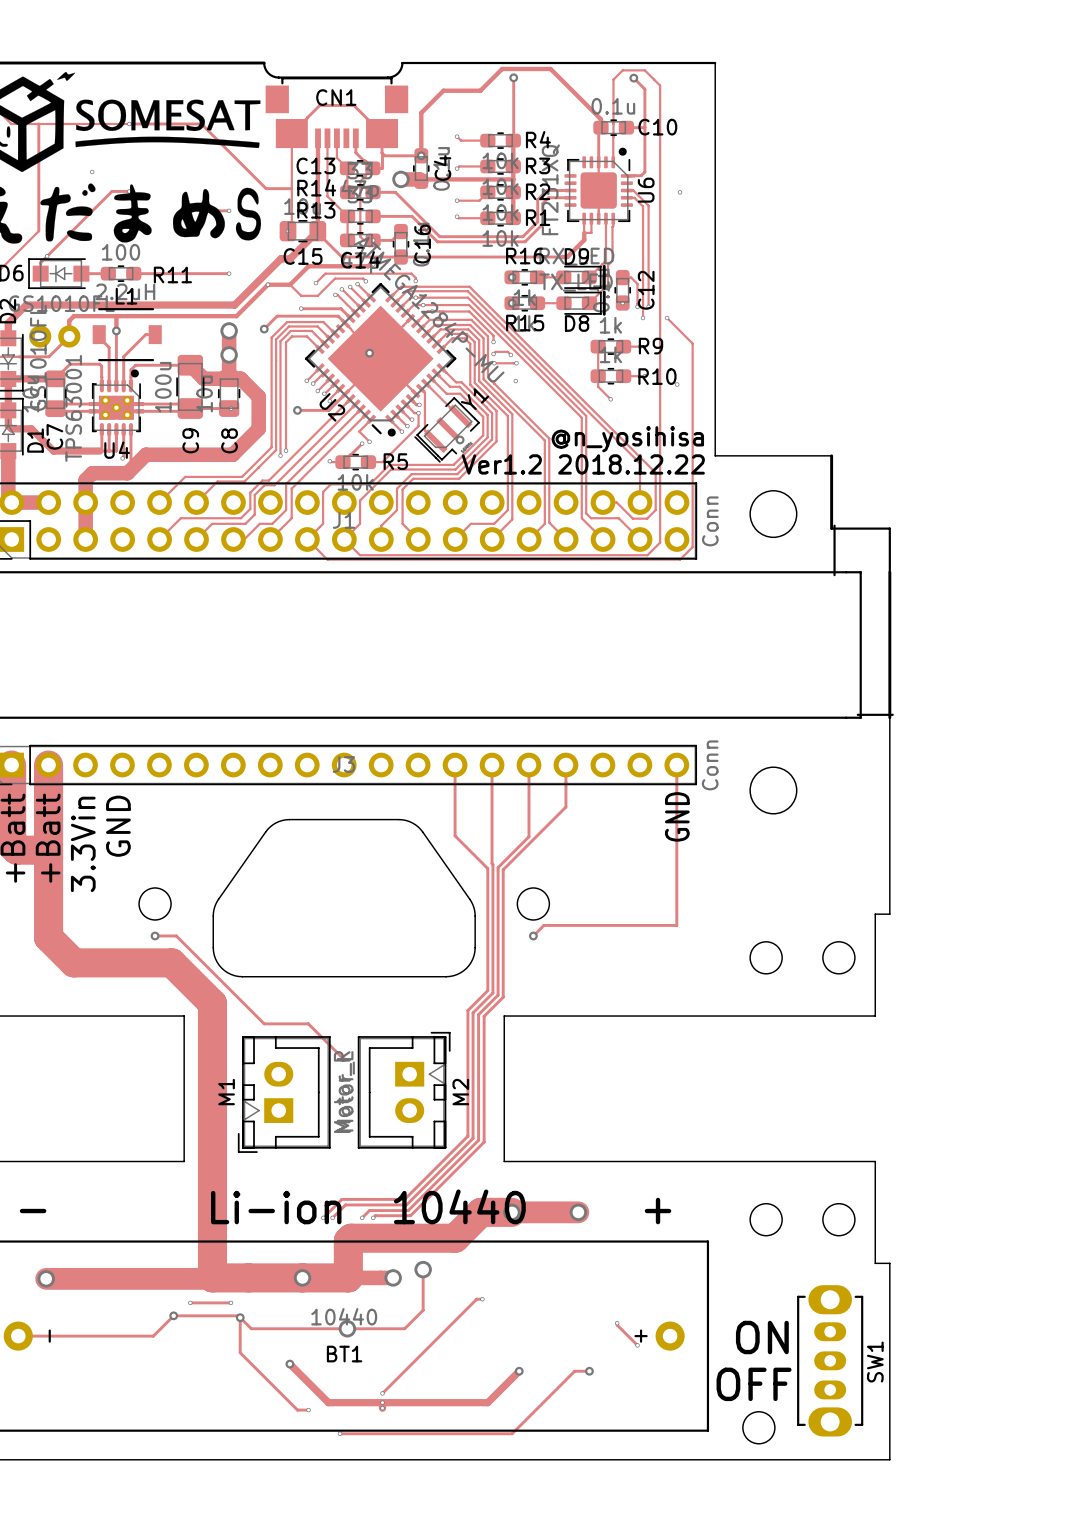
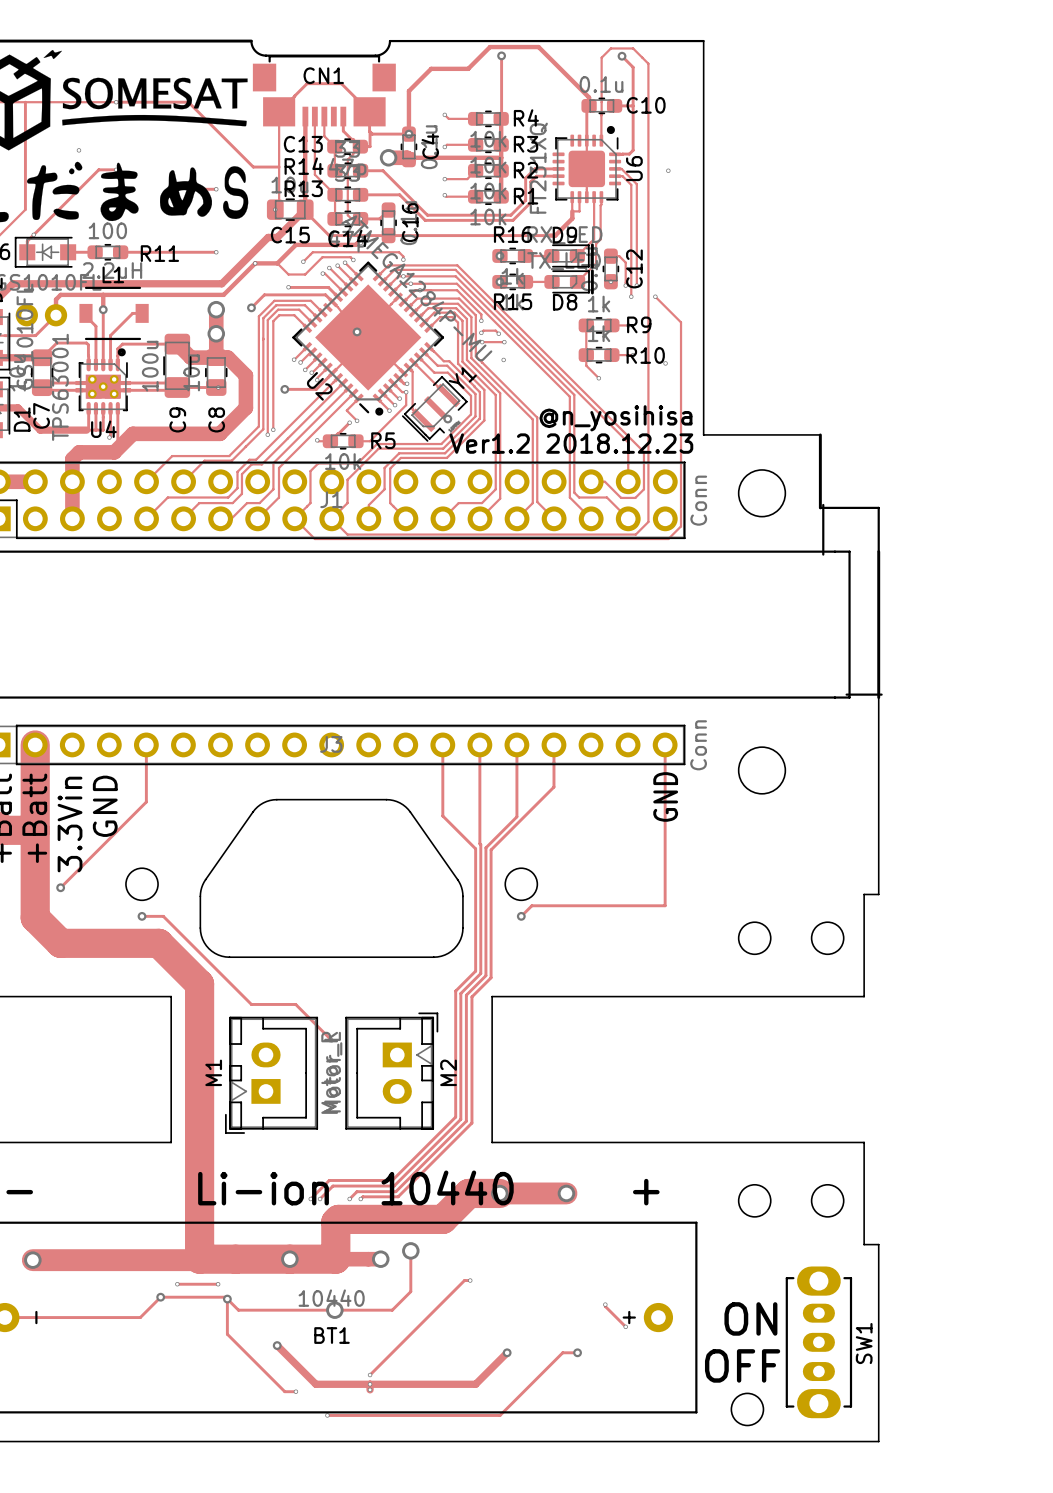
text: Ver1.2 2018.12.22 (583, 464) -> Ver1.2 2018.12.23 (571, 443)
track: none -> (146, 744) (146, 802) (60, 887)
via: none -> (60, 887)

